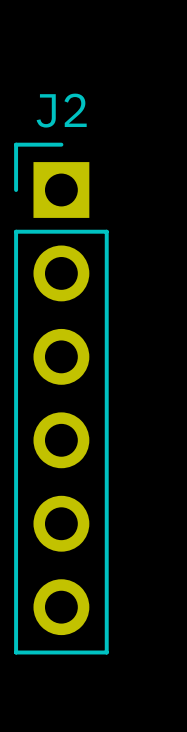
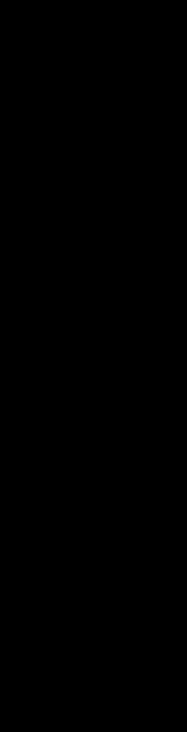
J2: (61, 398) -> none

